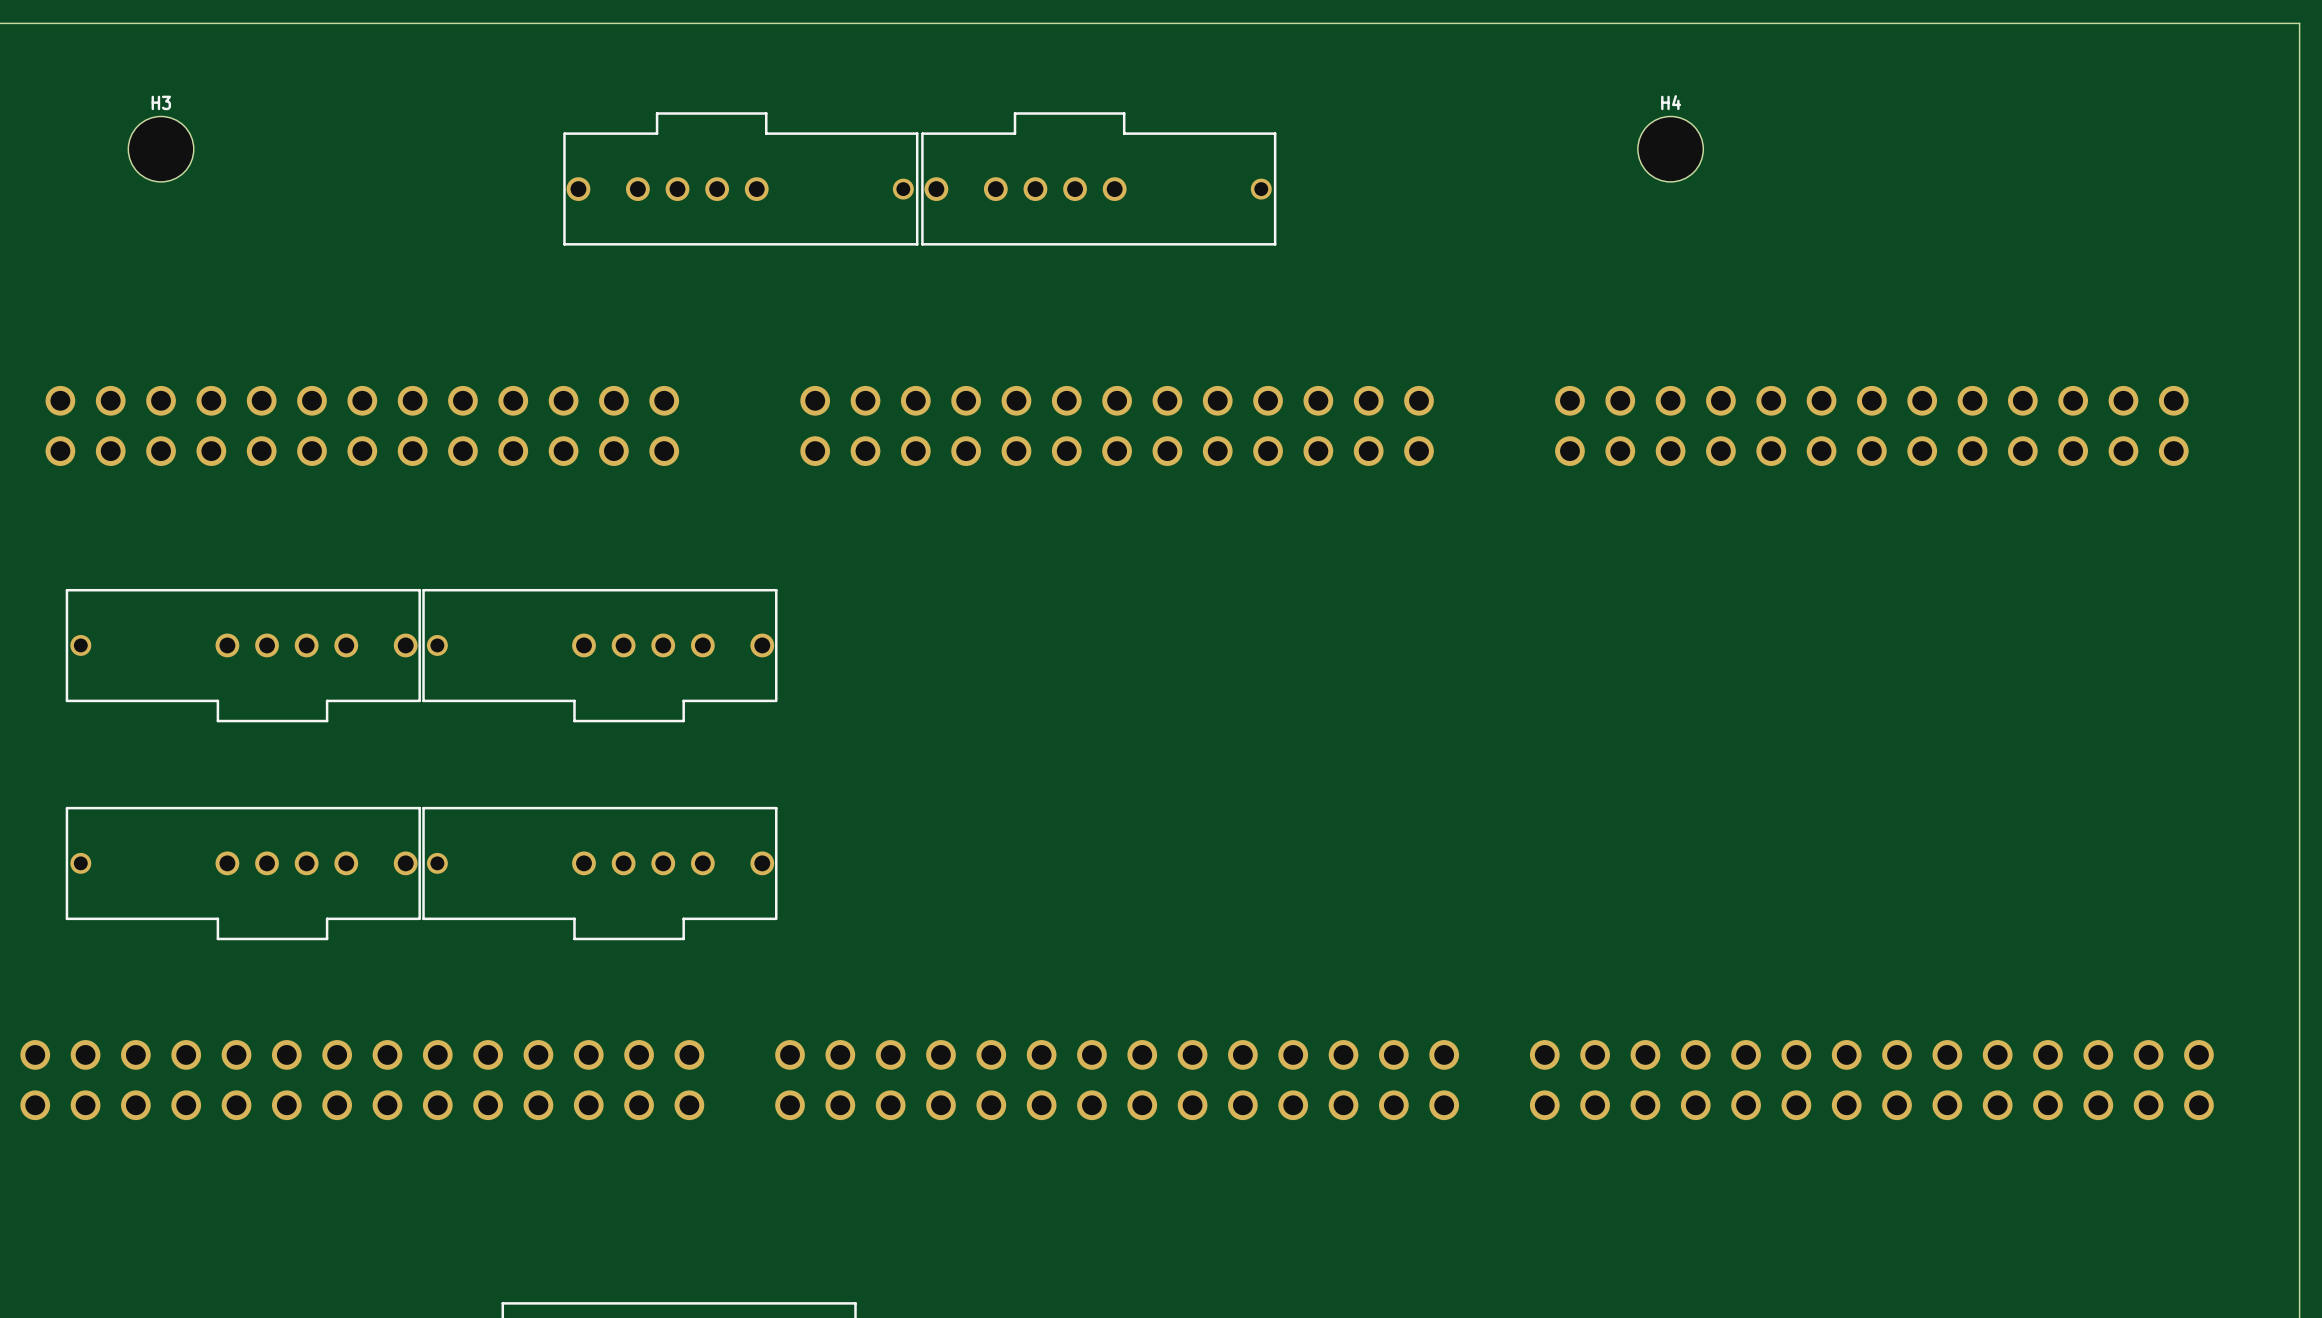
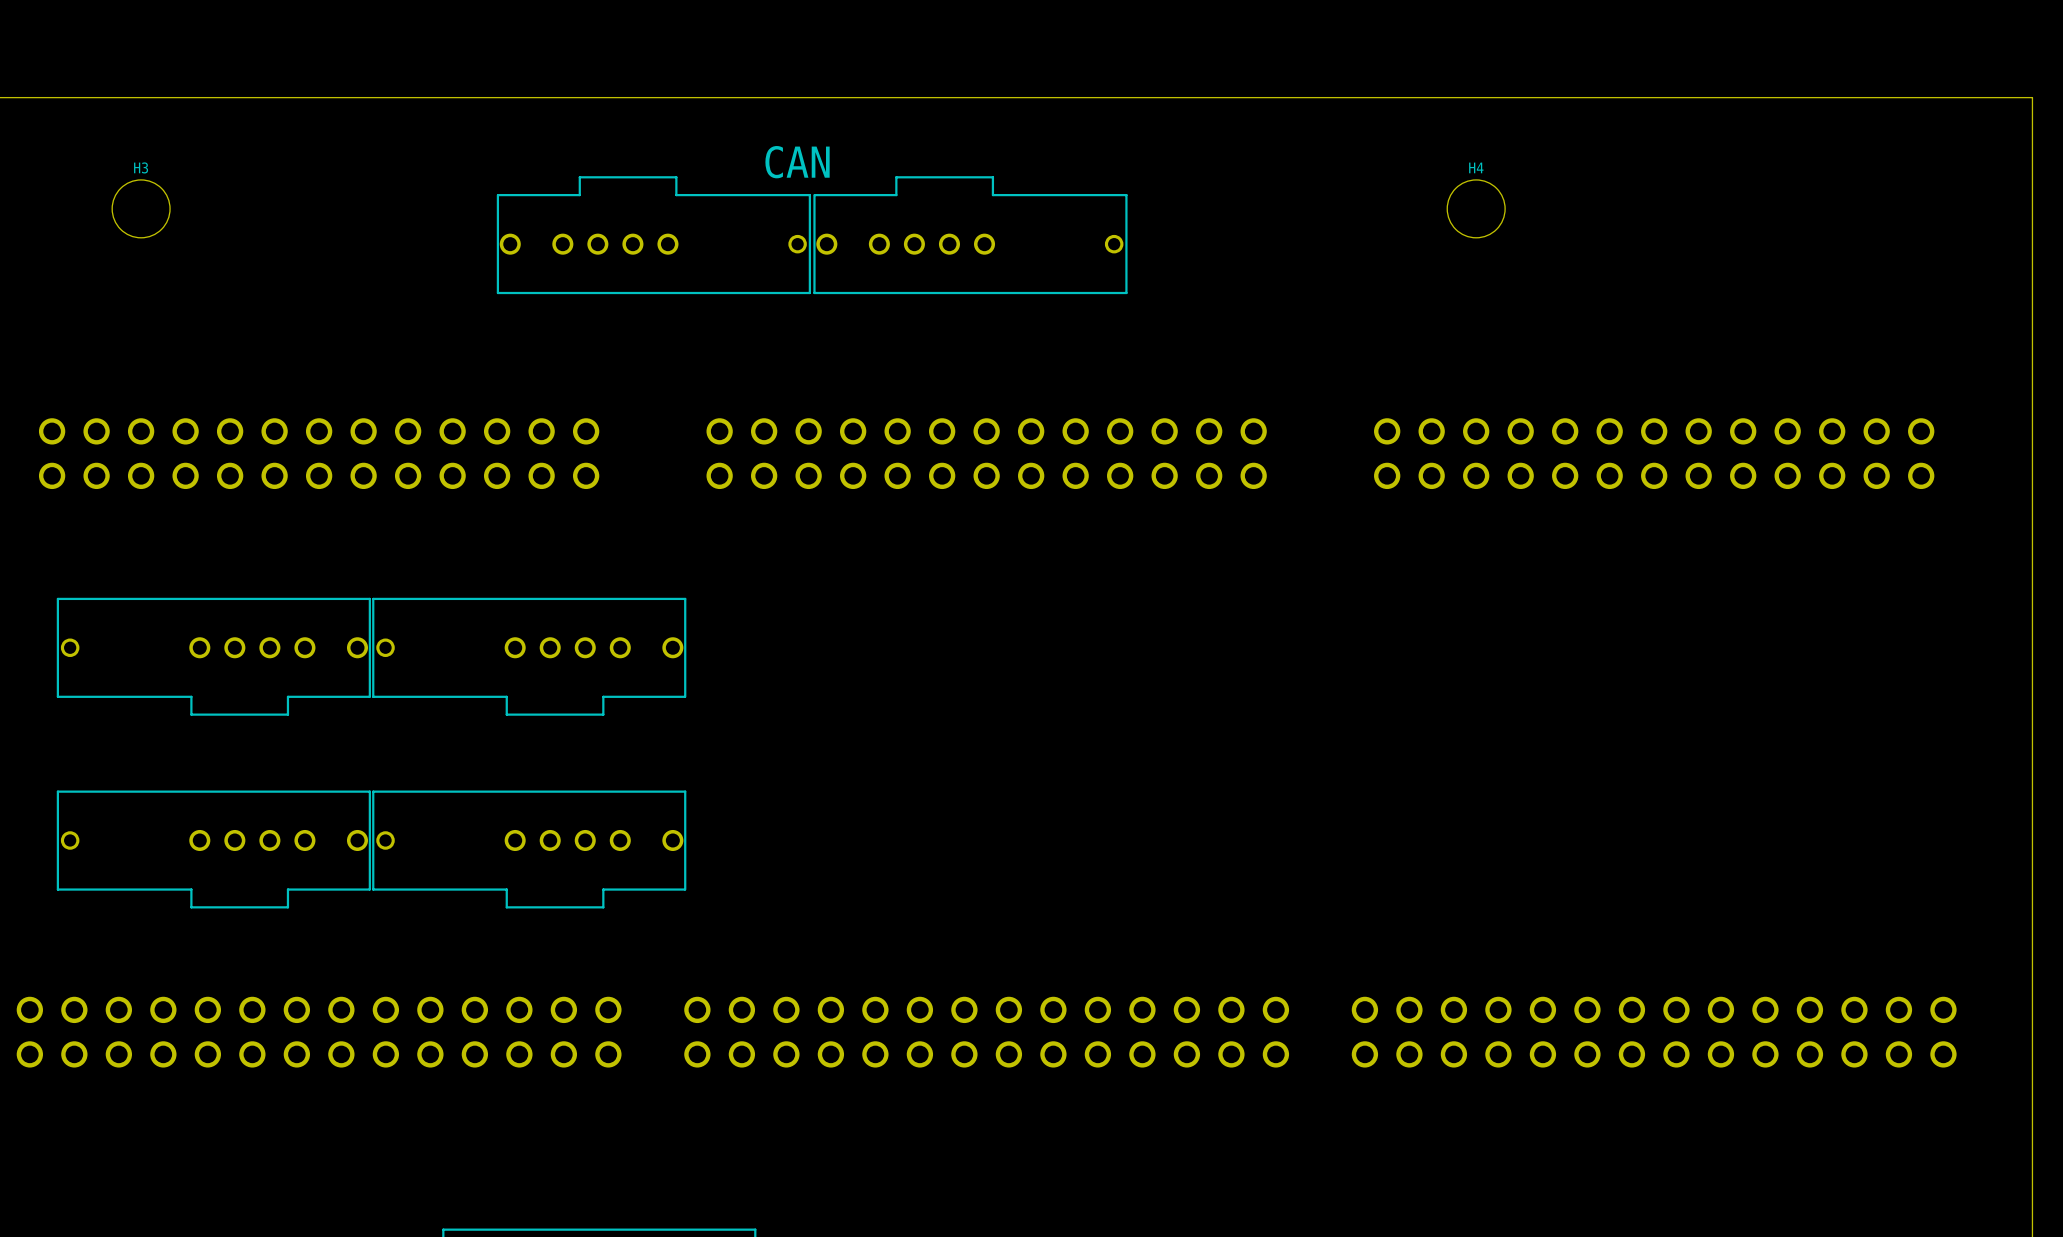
text: none -> CAN (797, 162)

